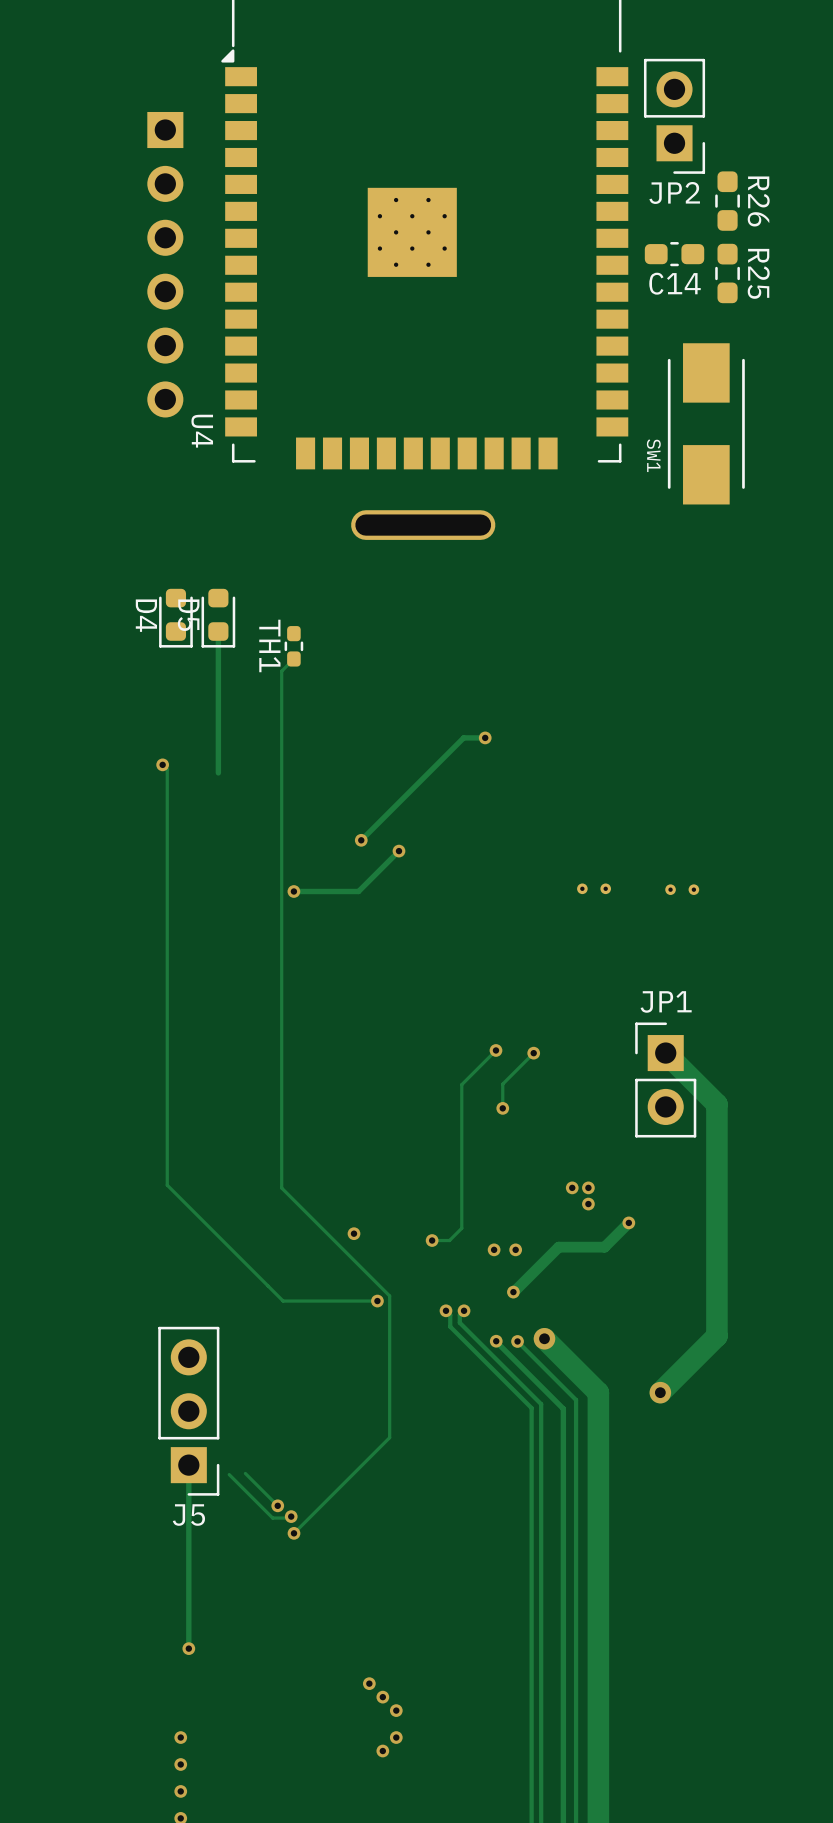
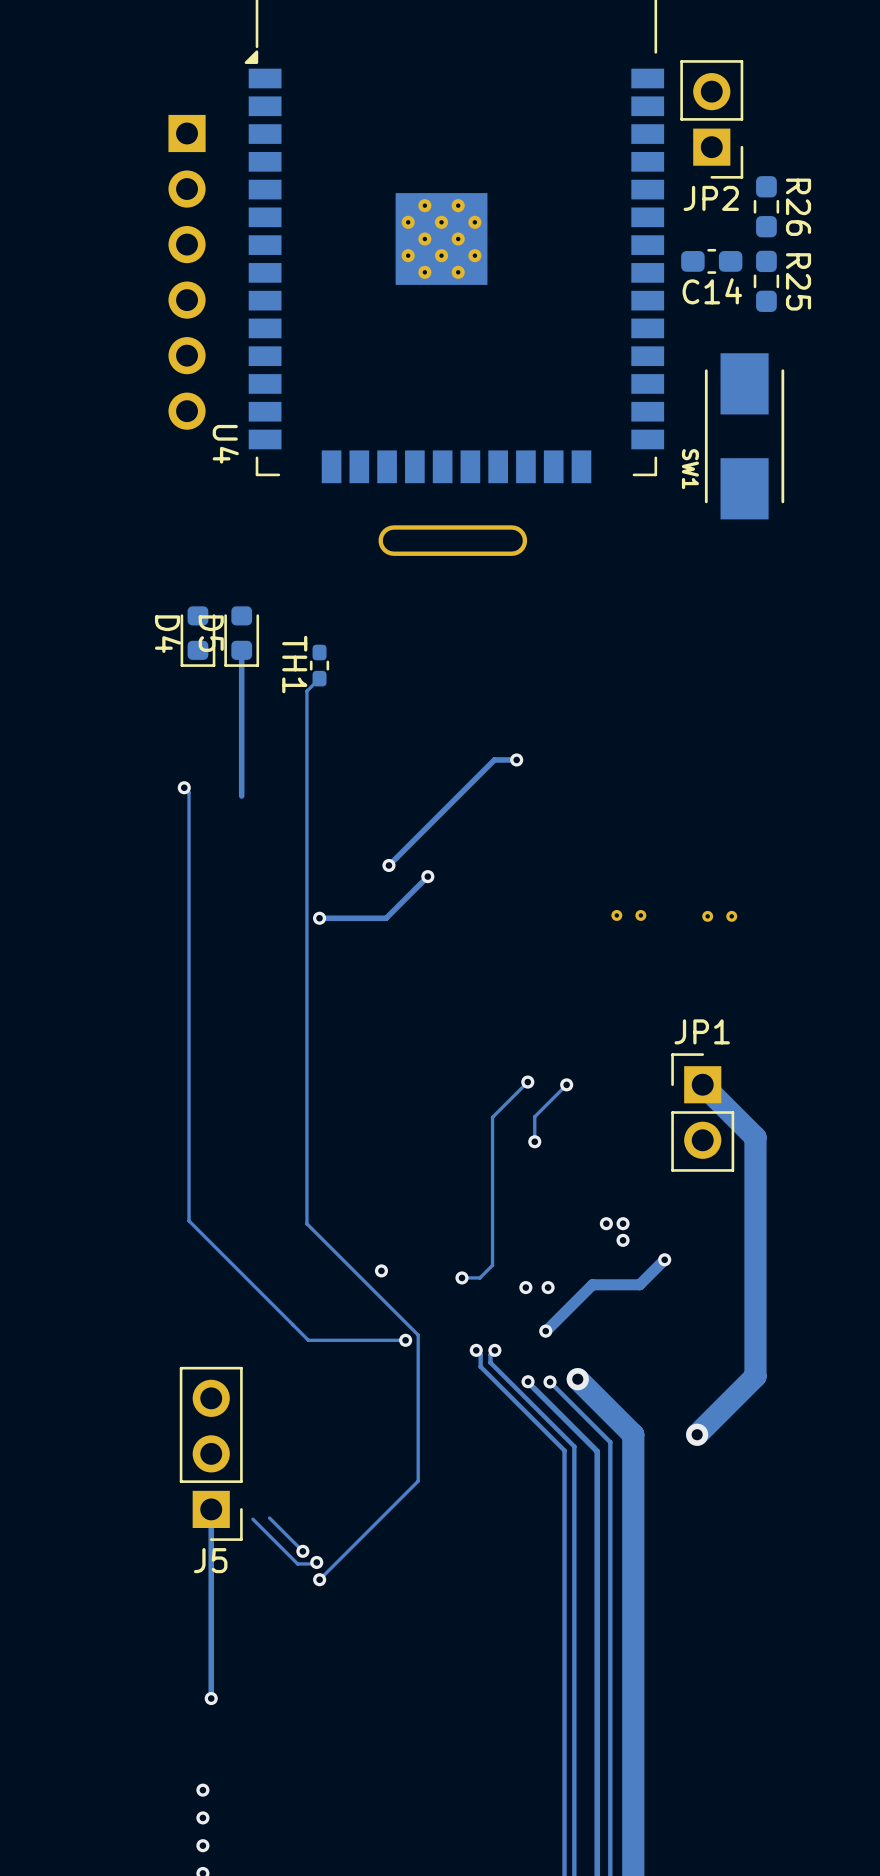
via: (369, 1683) -> none
via: (382, 1697) -> none
via: (396, 1710) -> none
via: (396, 1737) -> none
via: (382, 1751) -> none

